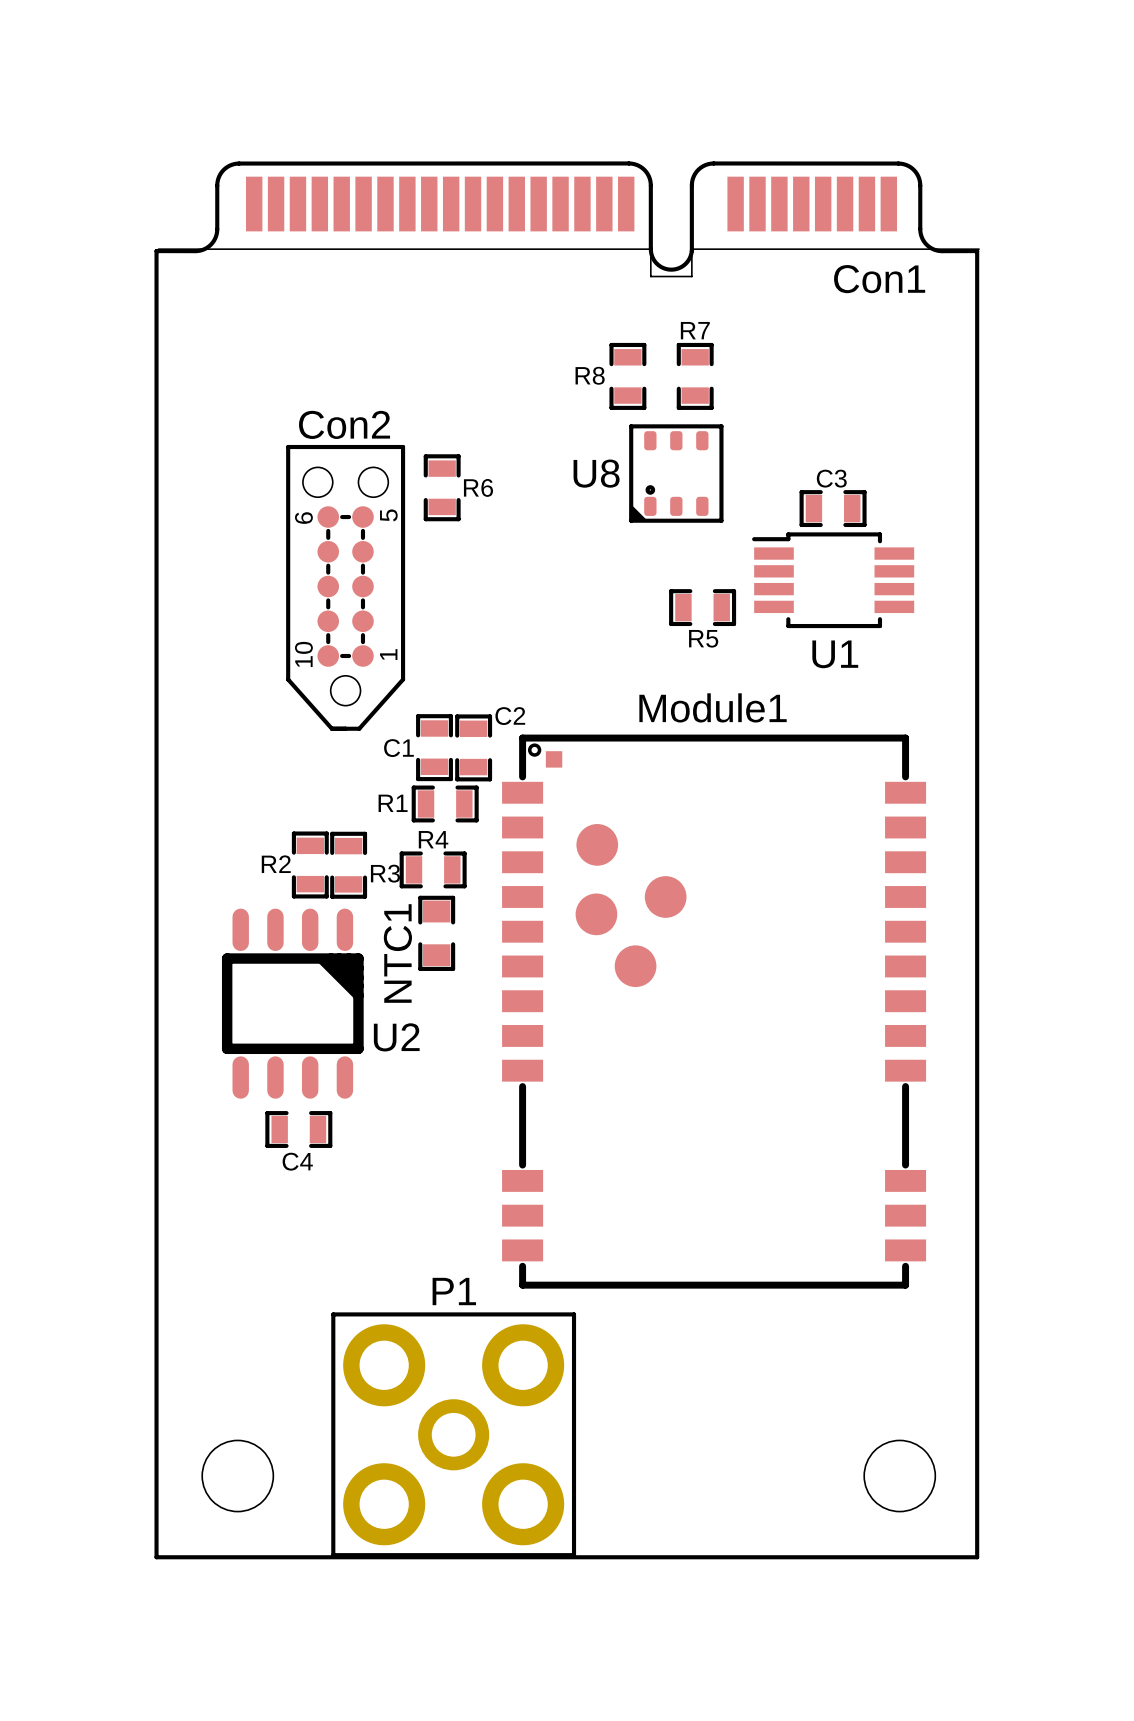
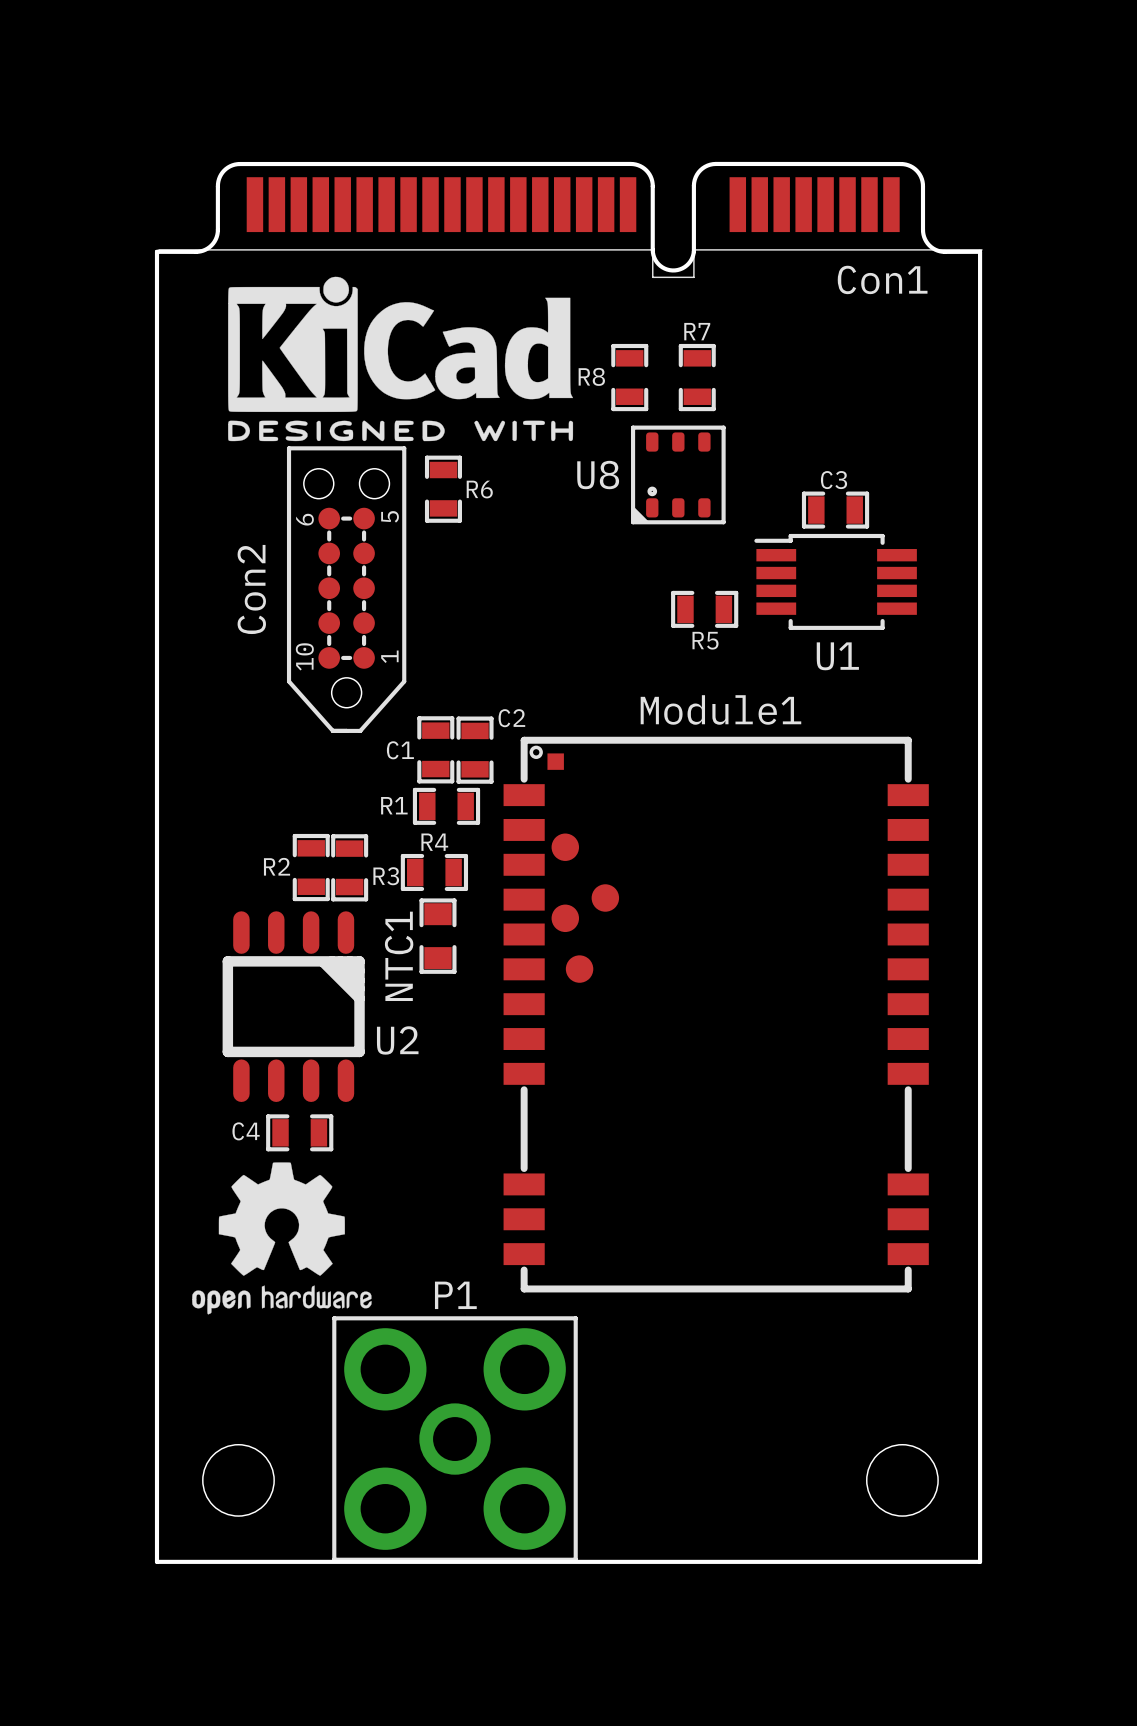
drawing: none -> [228, 276, 574, 442]
Con2 name rotation: 0° (344, 424) -> 90° counterclockwise (251, 589)
Con2 name position: Con2 (344, 424) -> Con2 (251, 589)
Module1 footprint: [502, 734, 927, 1289] -> [503, 736, 929, 1293]
drawing: none -> [192, 1162, 372, 1315]
C4 name position: C4 (297, 1161) -> C4 (246, 1131)

